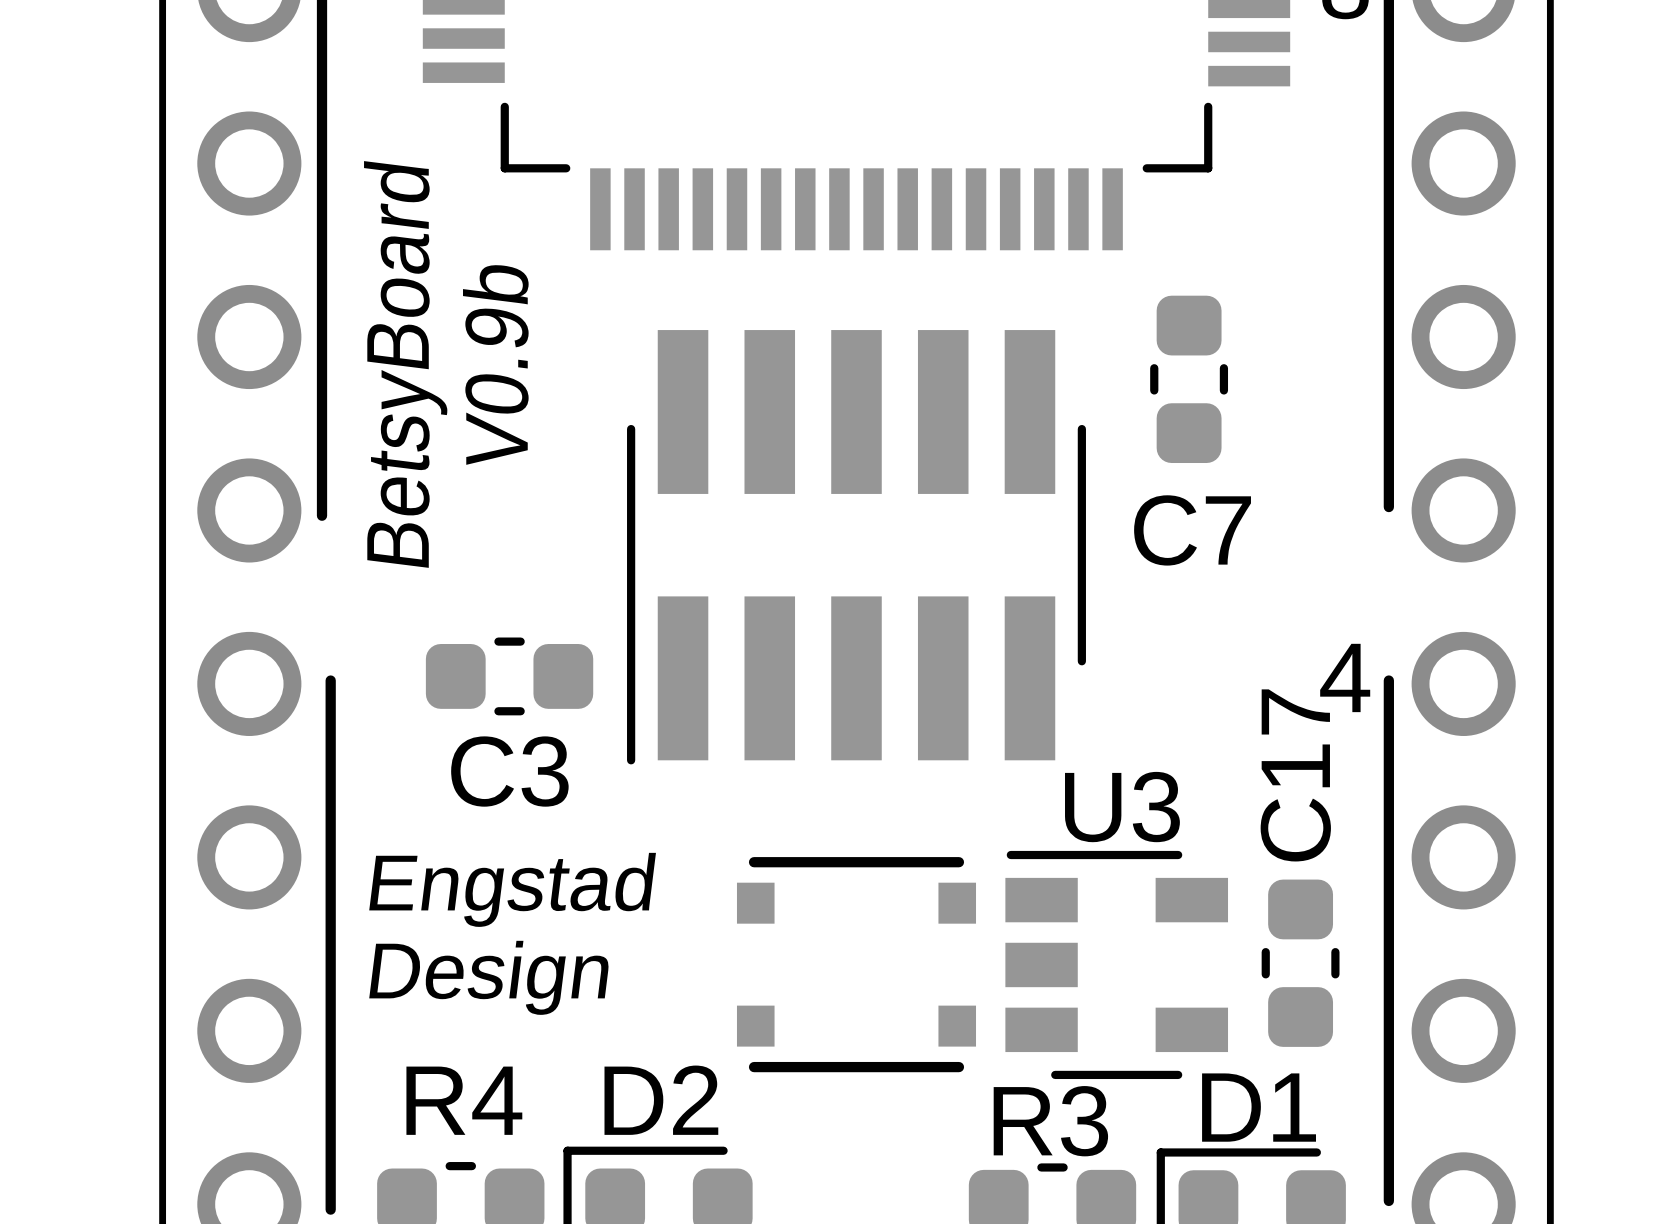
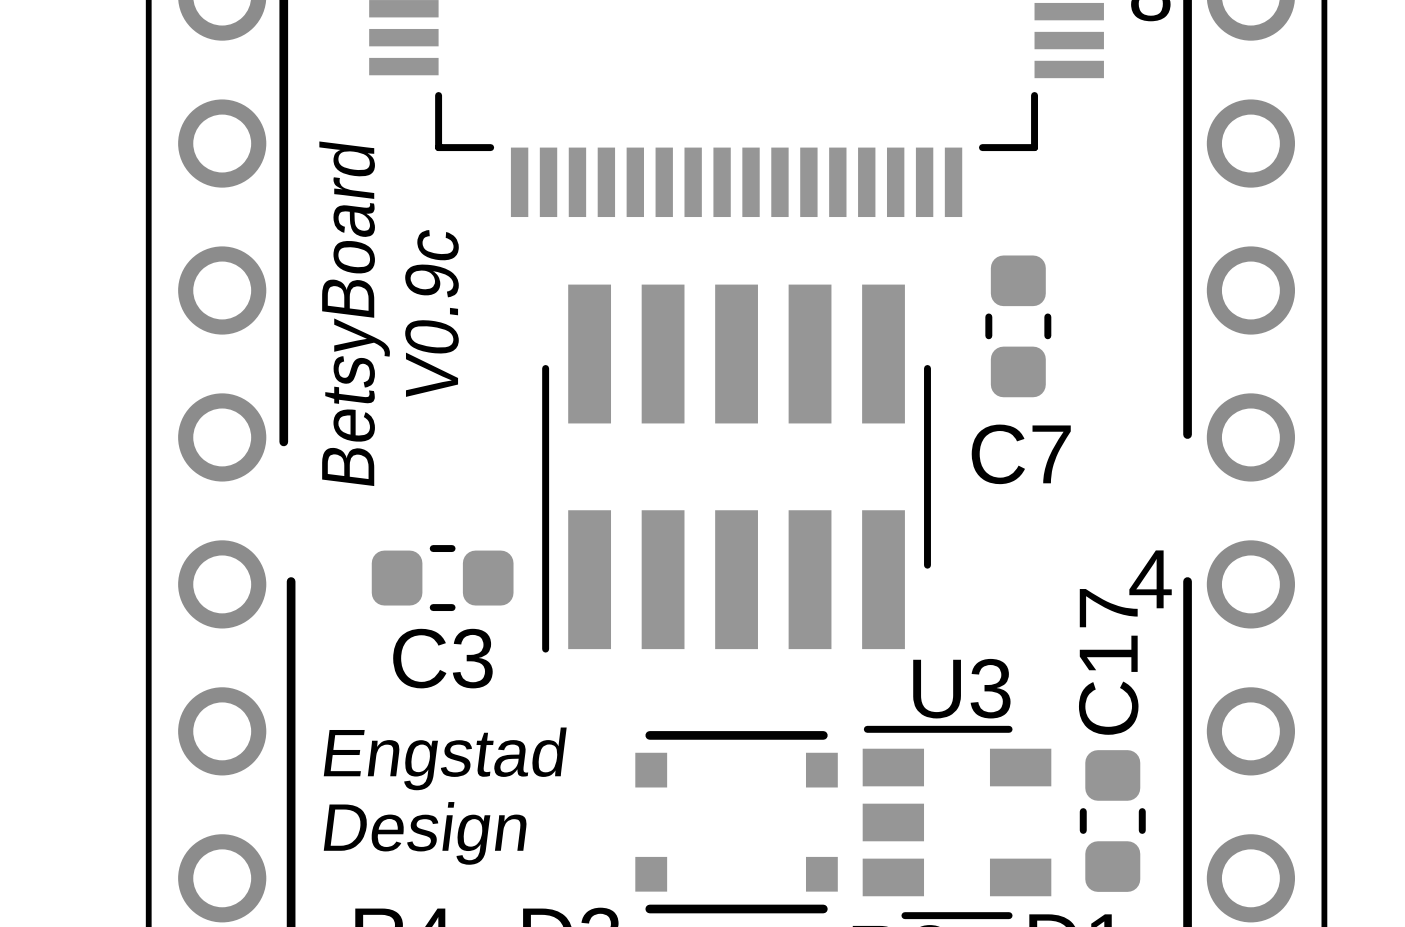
text: V0.9b (495, 364) -> V0.9c (432, 313)

